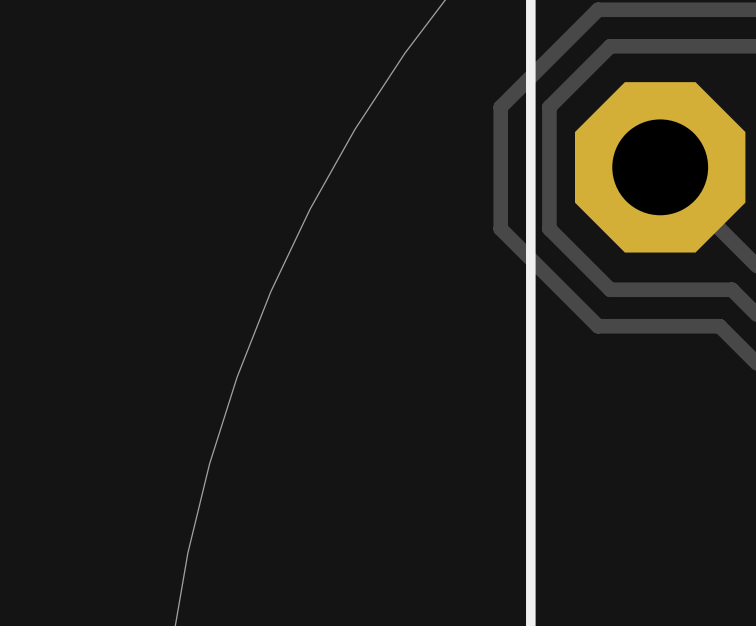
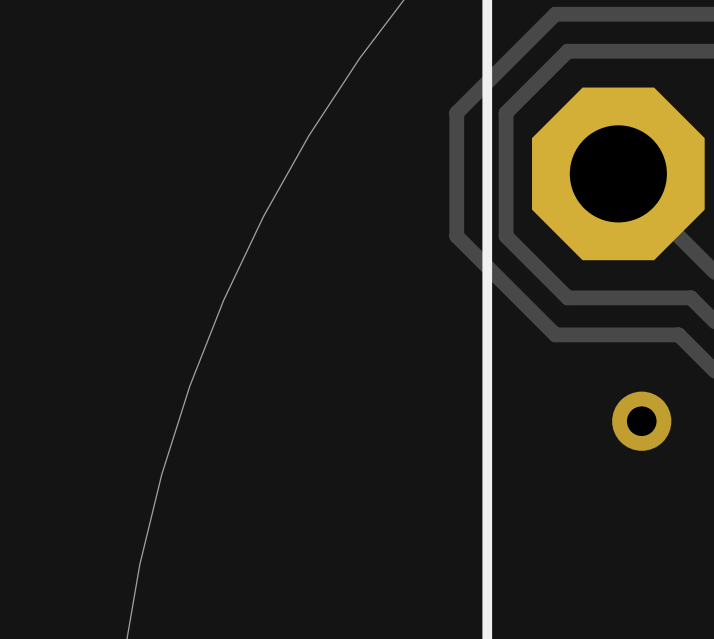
via: none -> (641, 421)

